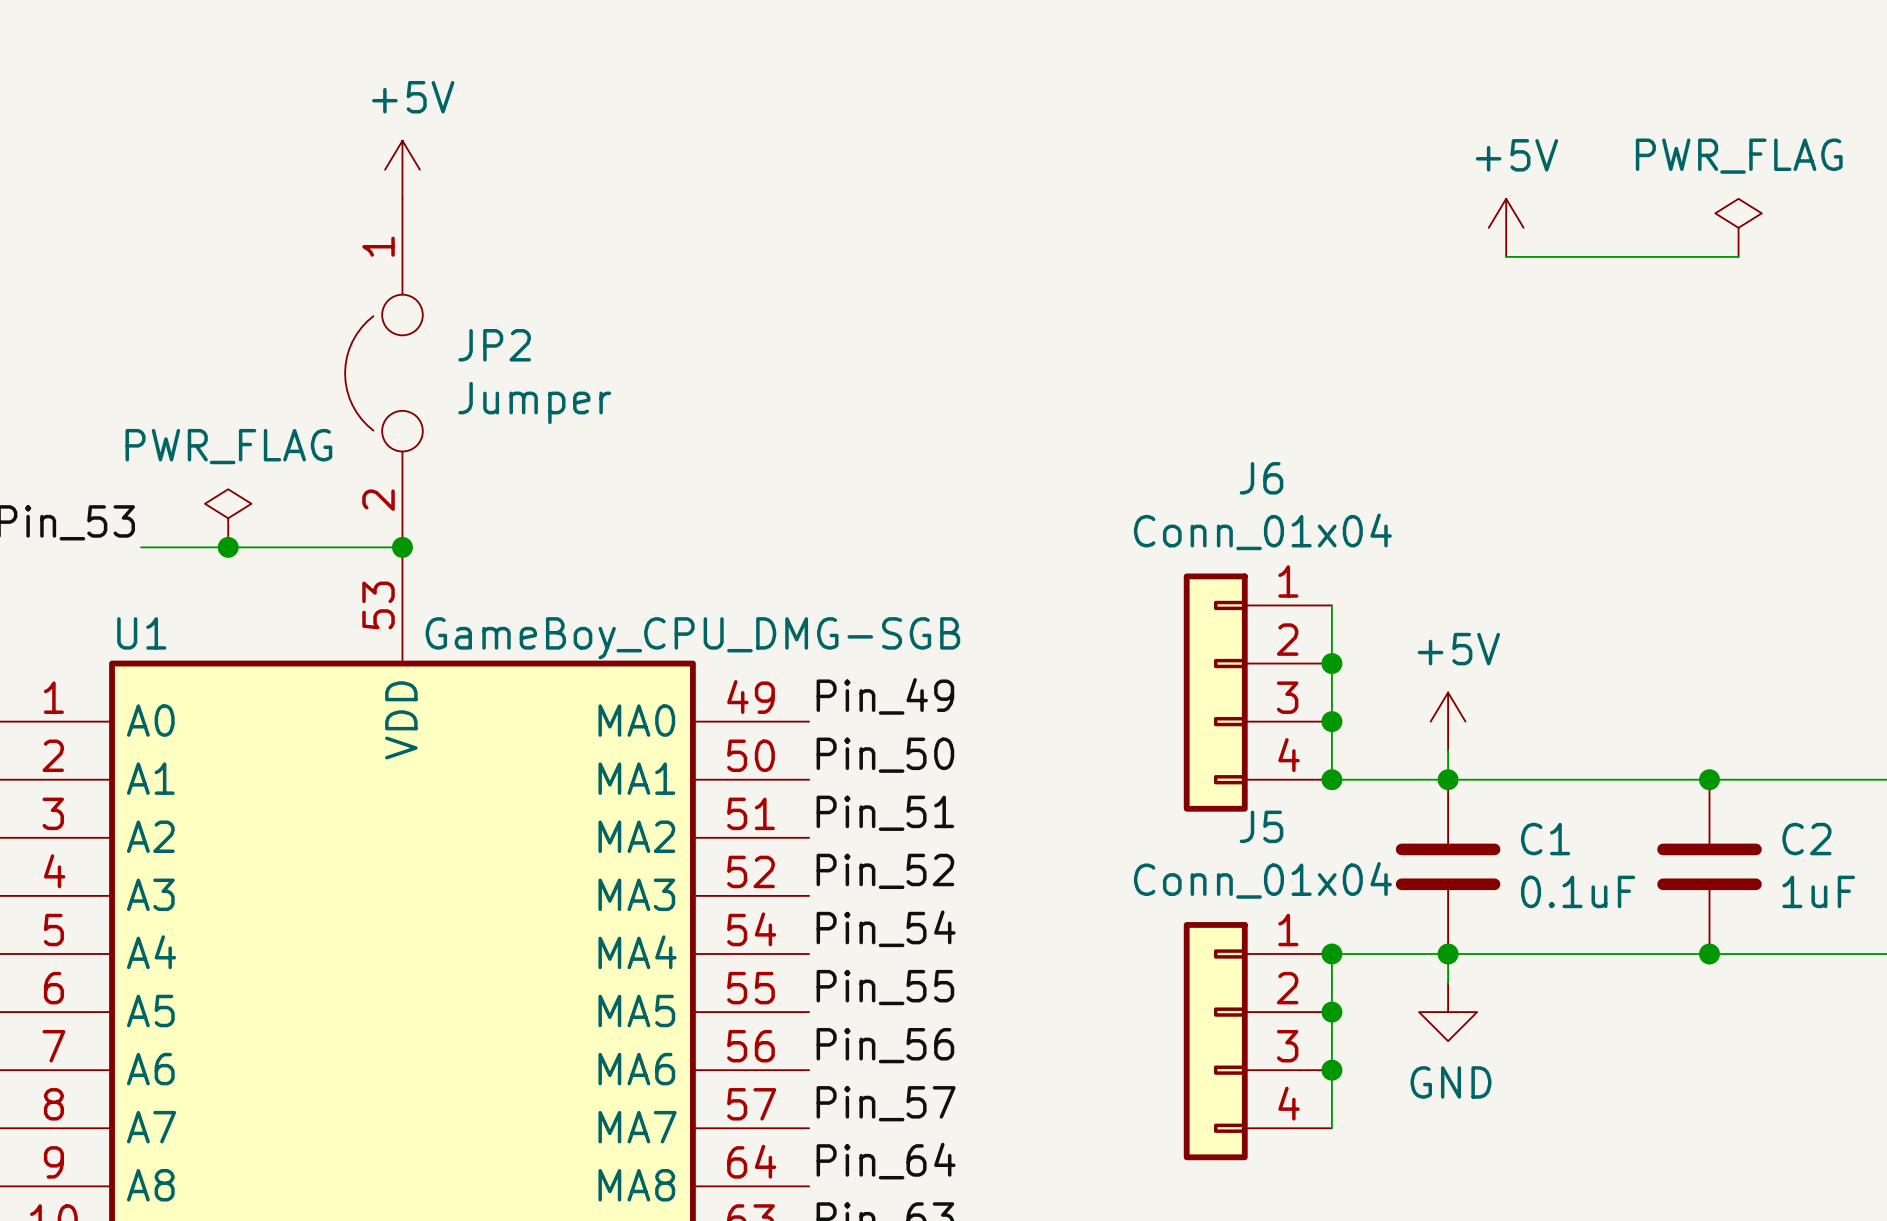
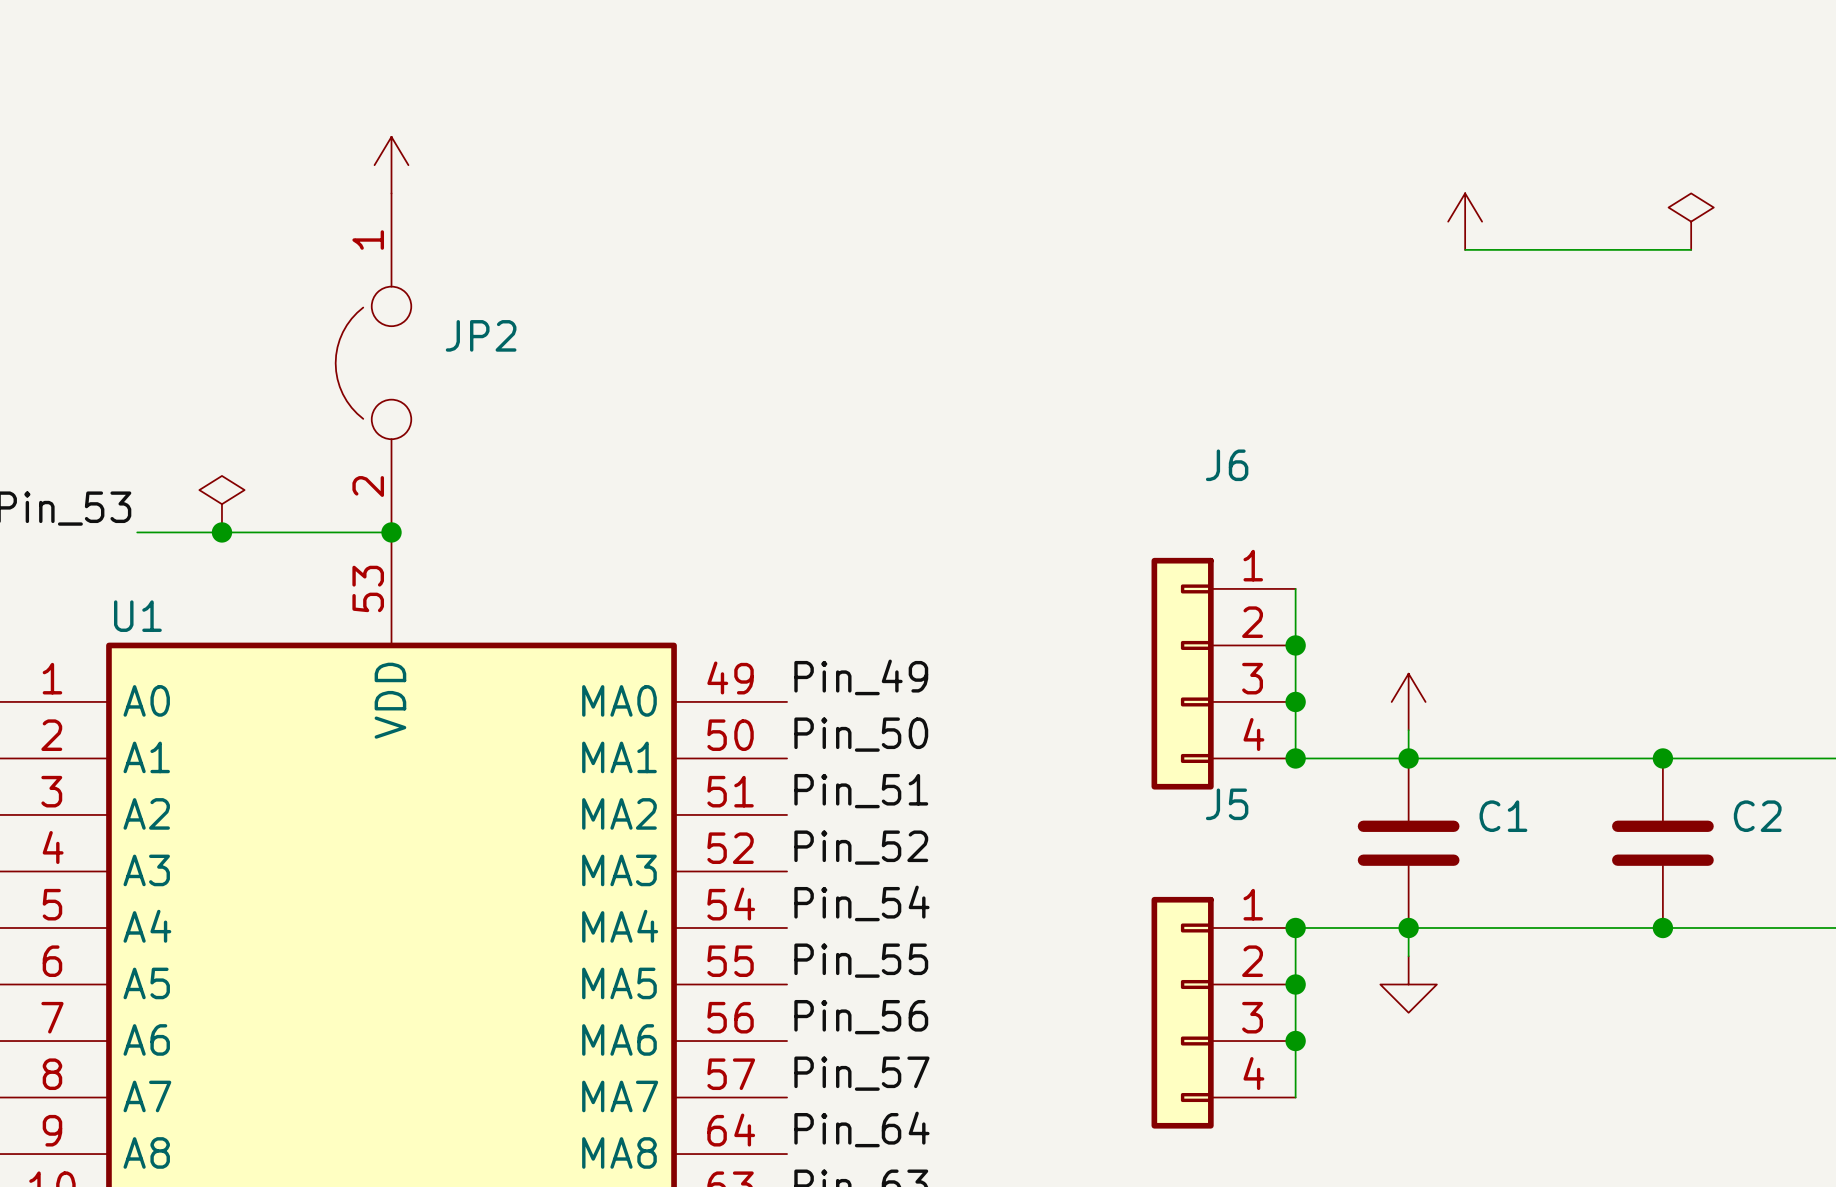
power symbol text: +5V (413, 97) -> none
power symbol text: +5V (1516, 155) -> none
power symbol text: PWR_FLAG (1739, 156) -> none
JP2 value: Jumper (534, 402) -> none
power symbol text: PWR_FLAG (228, 446) -> none
J6 value: Conn_01x04 (1262, 531) -> none
U1 value: GameBoy_CPU_DMG-SGB (692, 638) -> none
power symbol text: +5V (1458, 649) -> none
J5 value: Conn_01x04 (1262, 880) -> none
C1 value: 0.1uF (1578, 891) -> none
C2 value: 1uF (1818, 891) -> none
power symbol text: GND (1451, 1082) -> none

